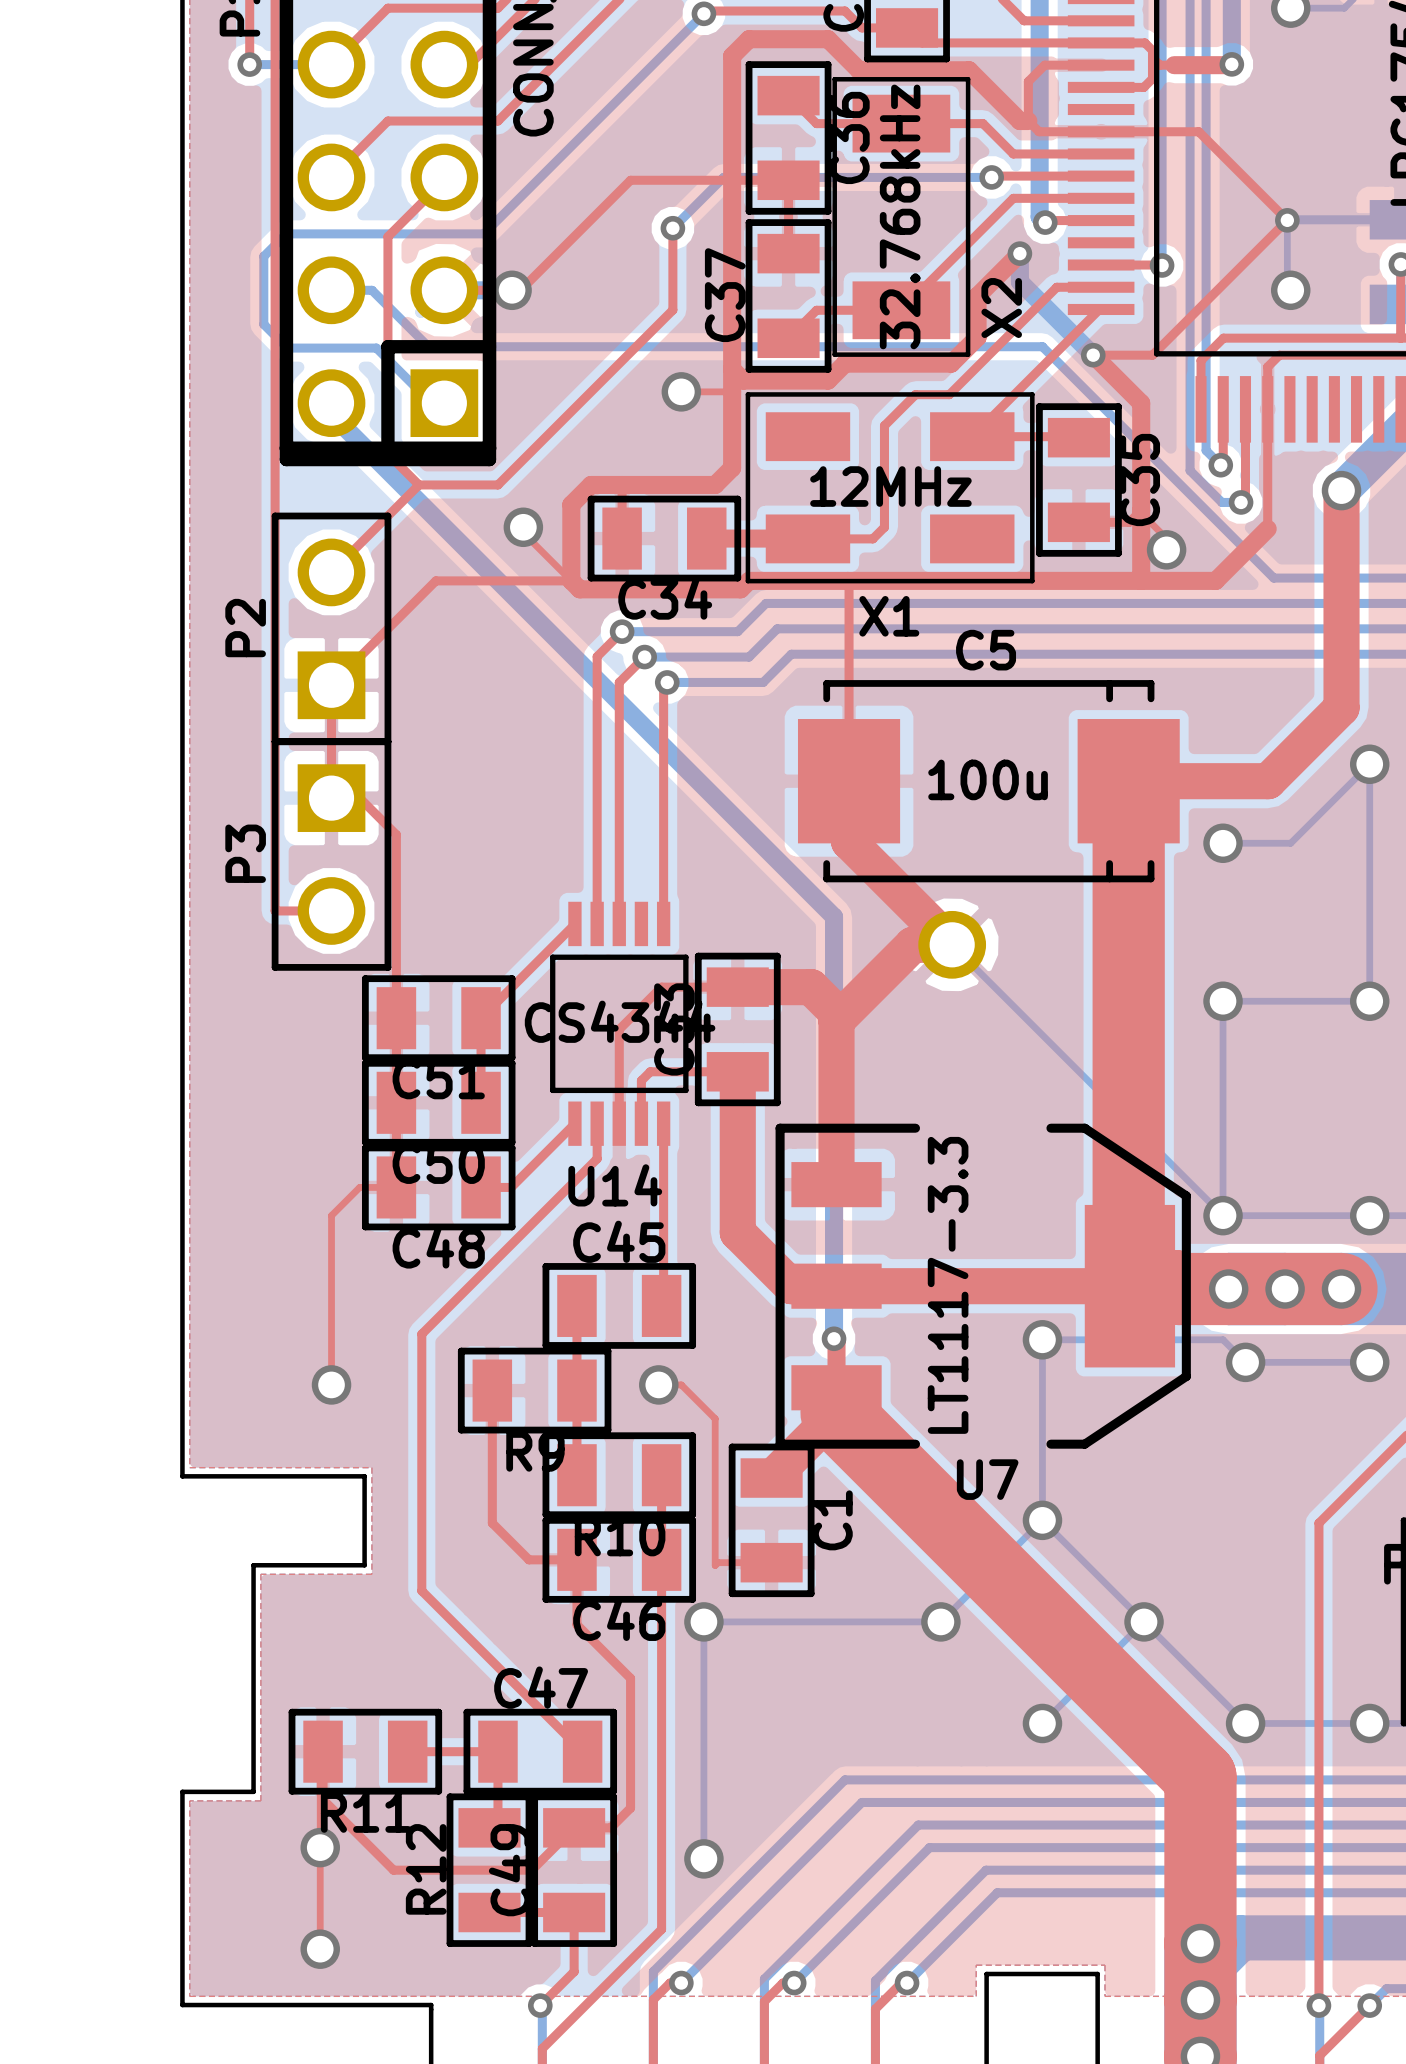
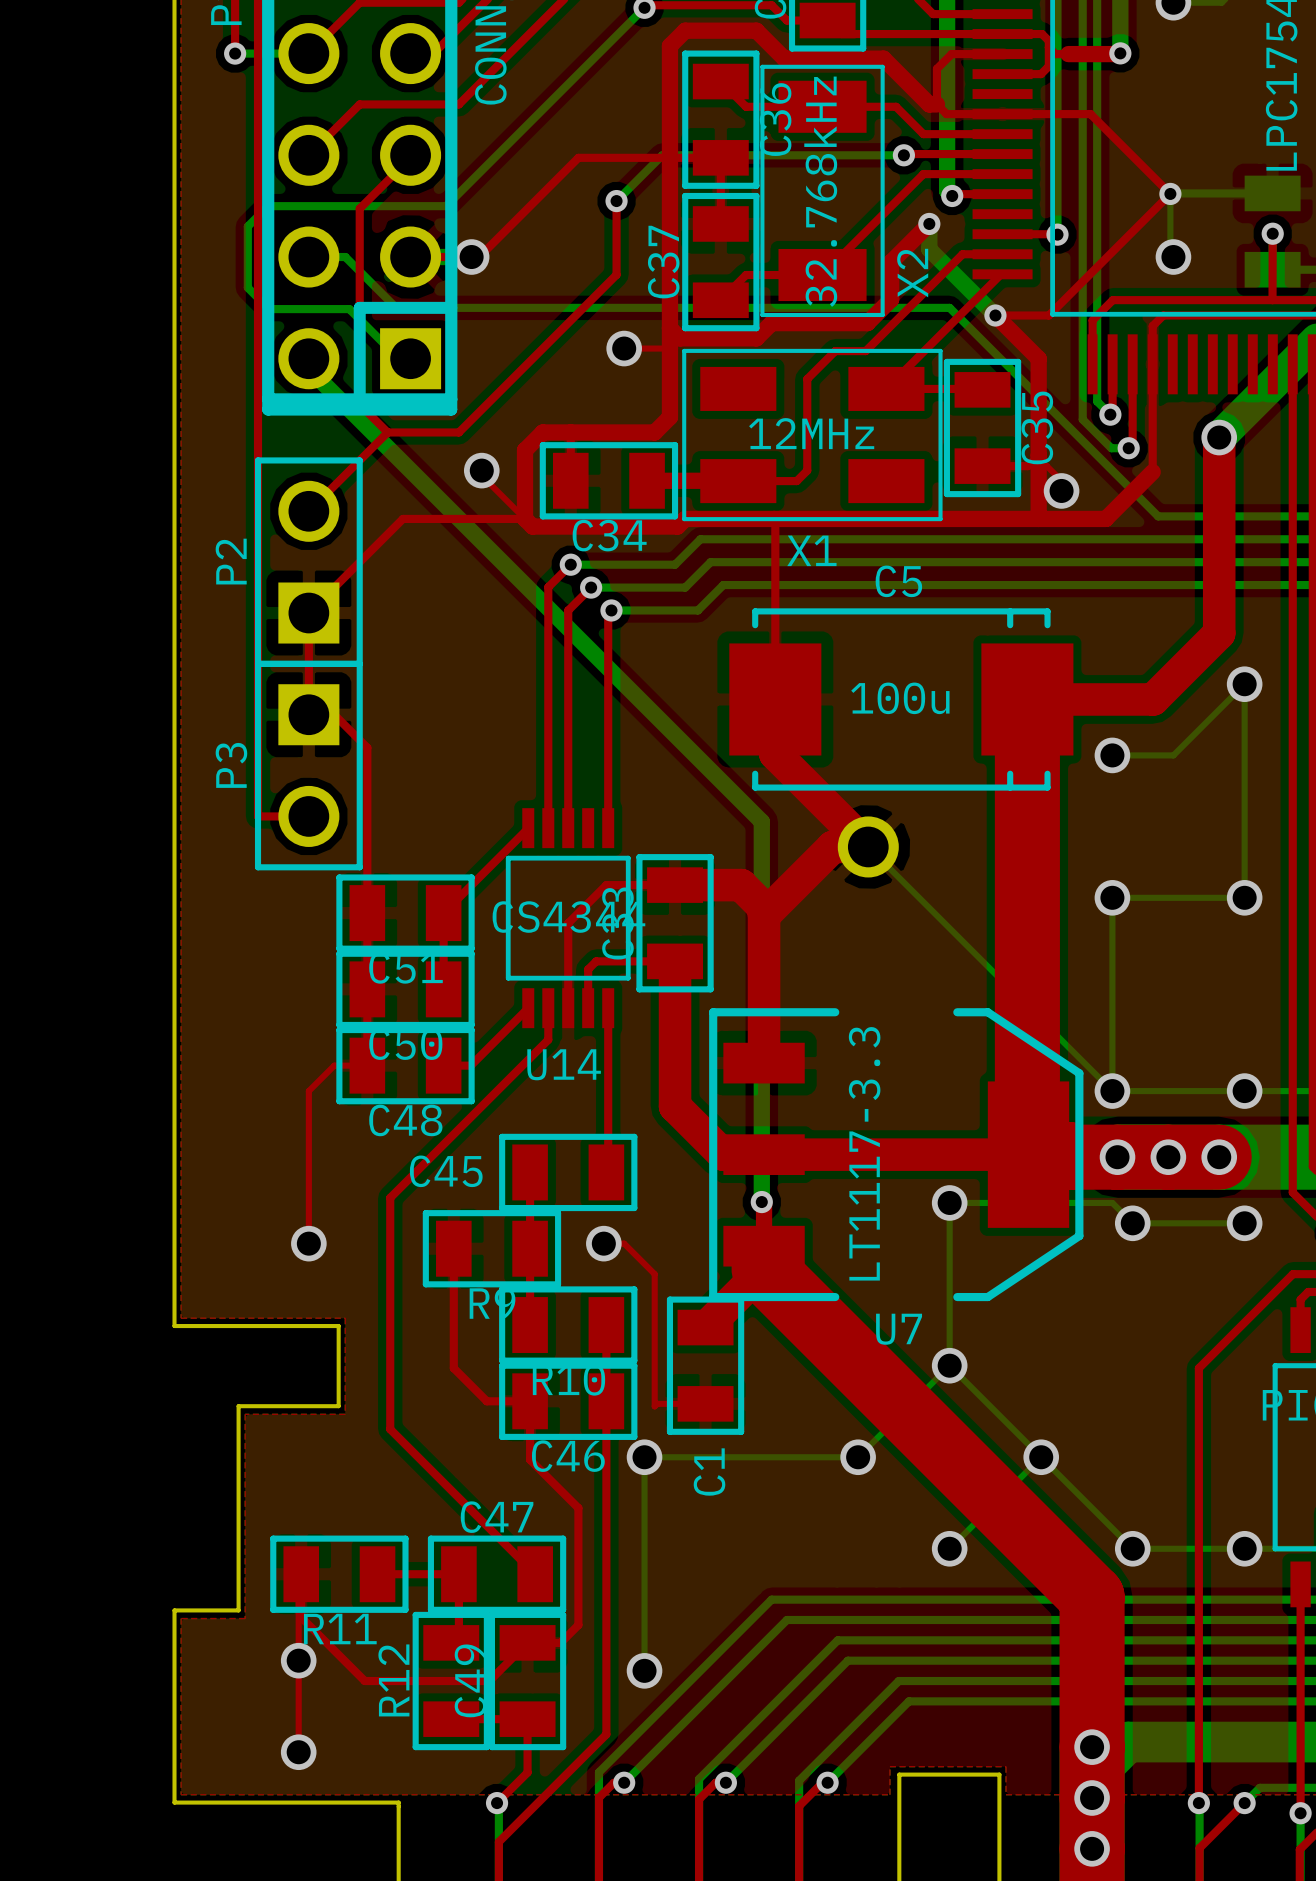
C45 name position: C45 (619, 1241) -> C45 (446, 1171)
C1 name position: C1 (832, 1520) -> C1 (709, 1472)

